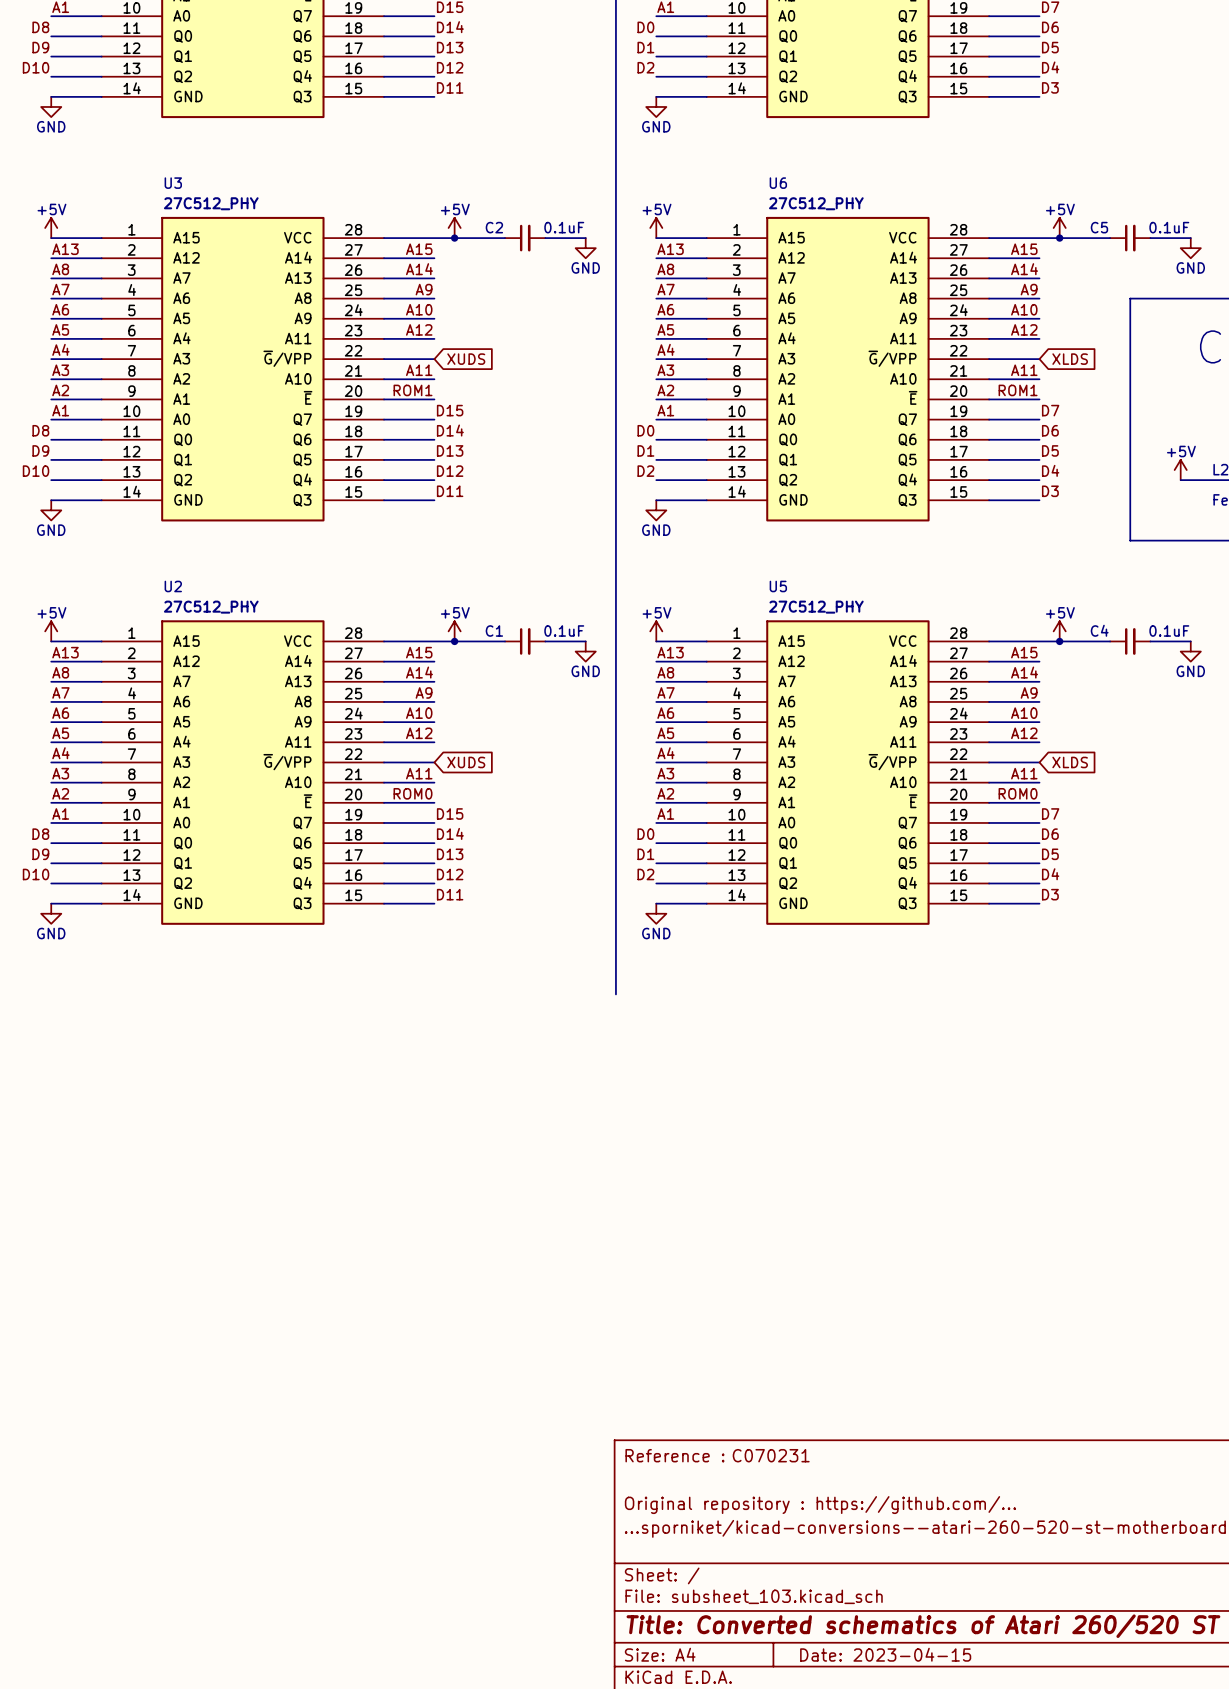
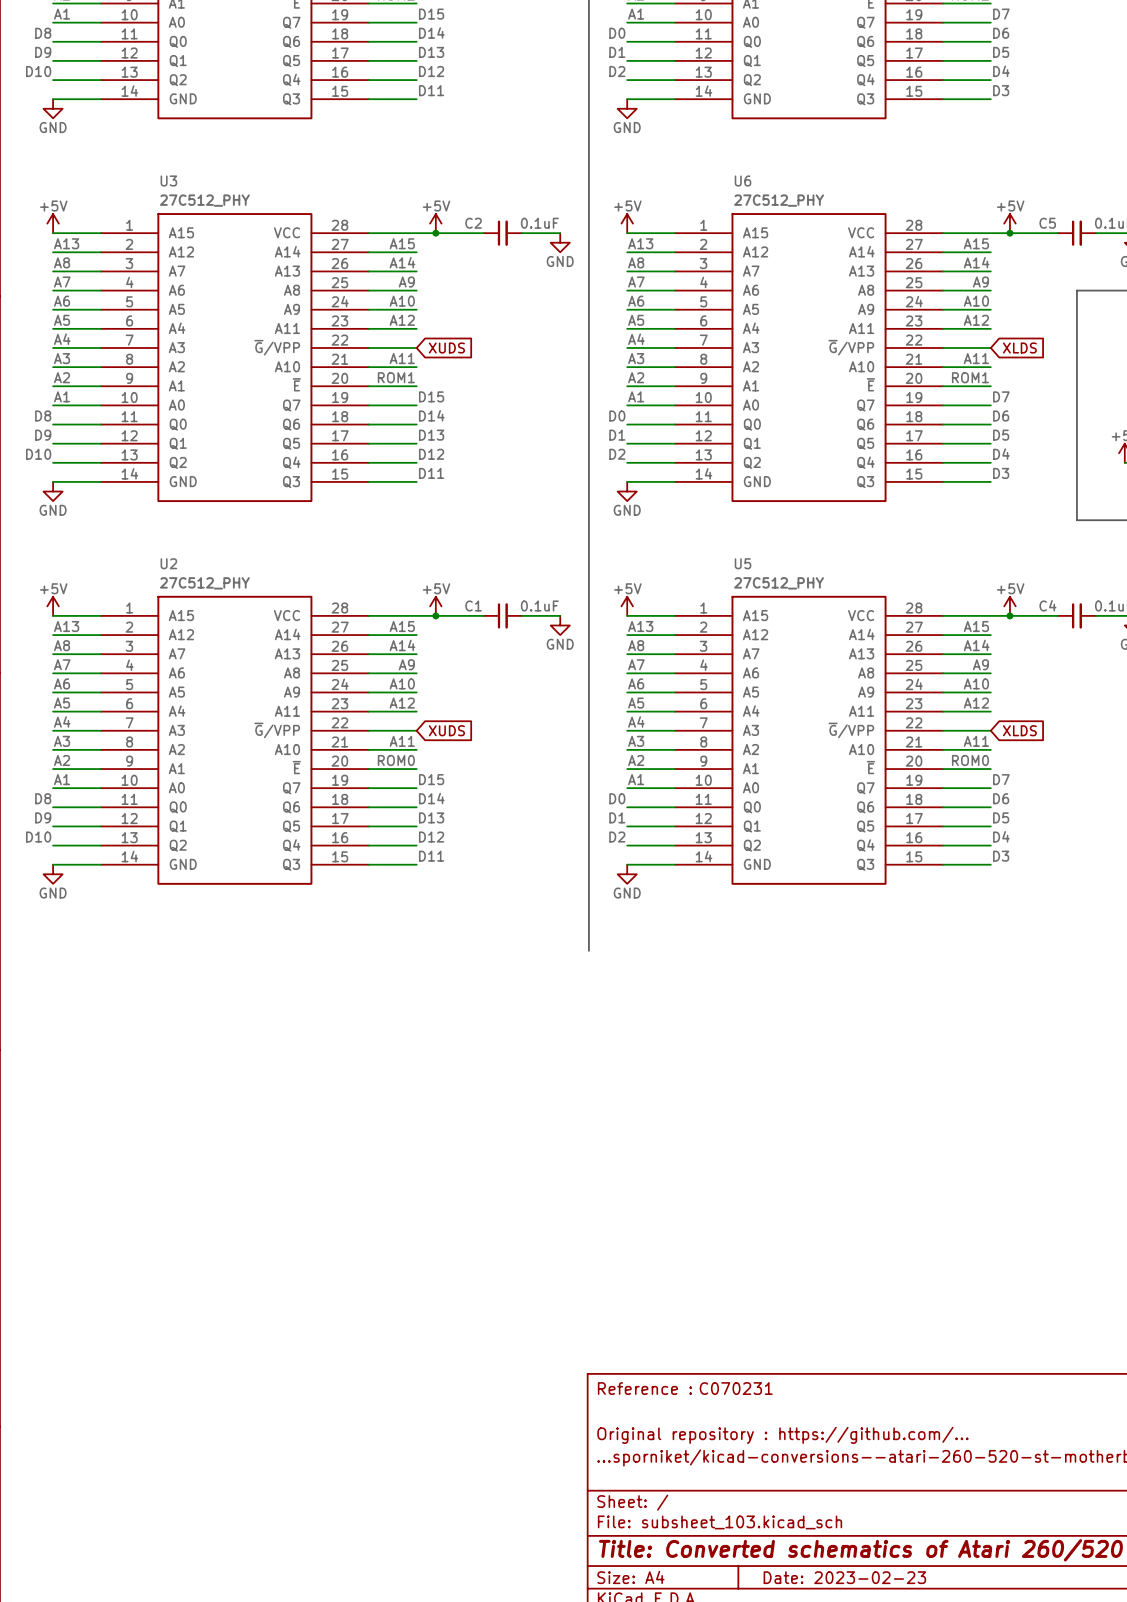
title block: Date: 2023-04-15 (885, 1654) -> Date: 2023-02-23 (844, 1577)

